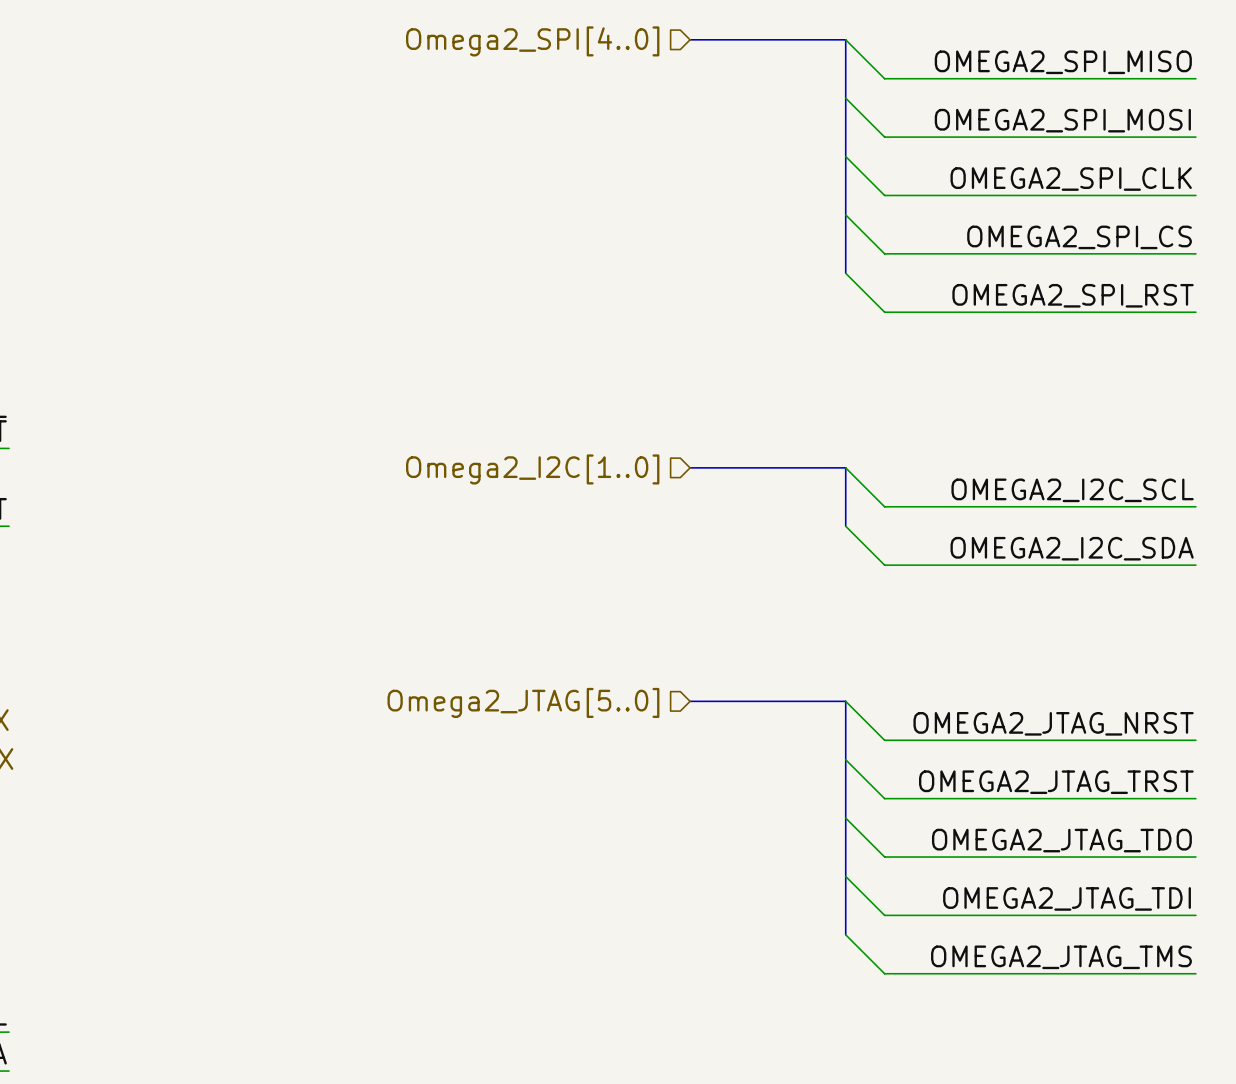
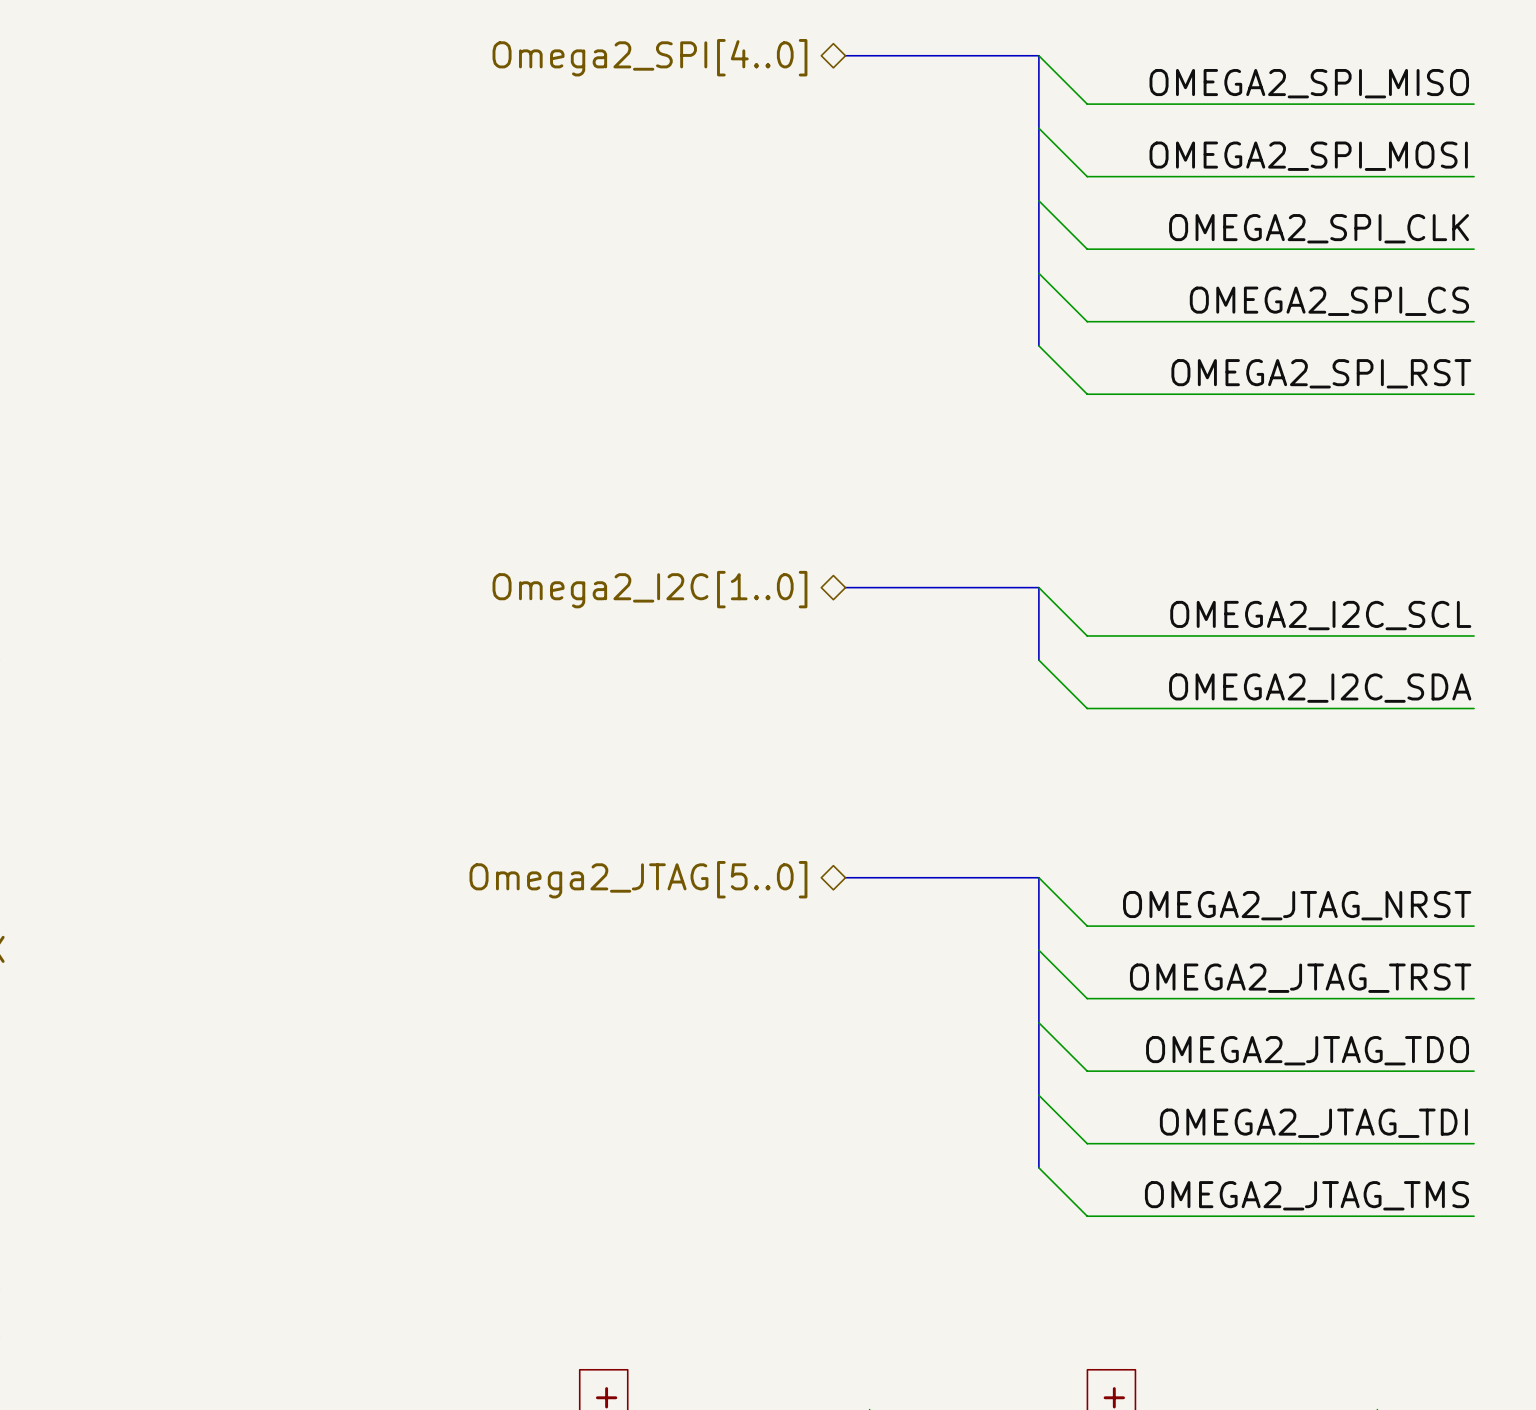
hierarchical label shape: input (532, 41) -> bidirectional (649, 57)
hierarchical label shape: input (532, 469) -> bidirectional (649, 589)
hierarchical label shape: input (523, 702) -> bidirectional (638, 879)

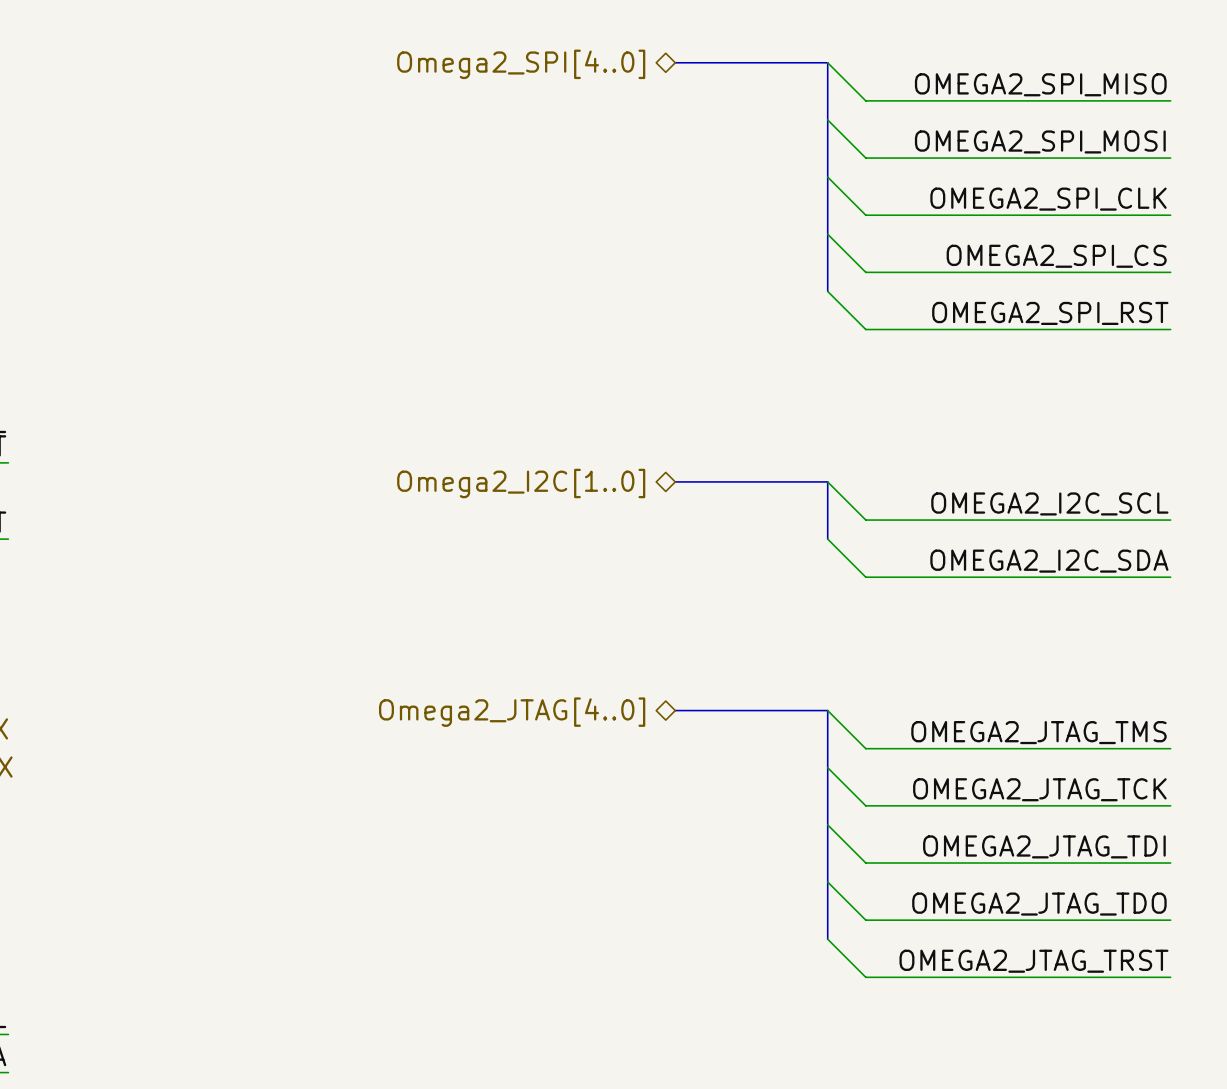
hierarchical label: Omega2_JTAG[5..0] (638, 879) -> Omega2_JTAG[4..0] (512, 712)
label: OMEGA2_JTAG_NRST (1297, 905) -> OMEGA2_JTAG_TMS (1038, 732)
label: OMEGA2_JTAG_TRST (1300, 978) -> OMEGA2_JTAG_TCK (1039, 789)
label: OMEGA2_JTAG_TDO (1307, 1050) -> OMEGA2_JTAG_TDI (1044, 846)
label: OMEGA2_JTAG_TDI (1313, 1123) -> OMEGA2_JTAG_TDO (1039, 904)
label: OMEGA2_JTAG_TMS (1306, 1195) -> OMEGA2_JTAG_TRST (1033, 961)

